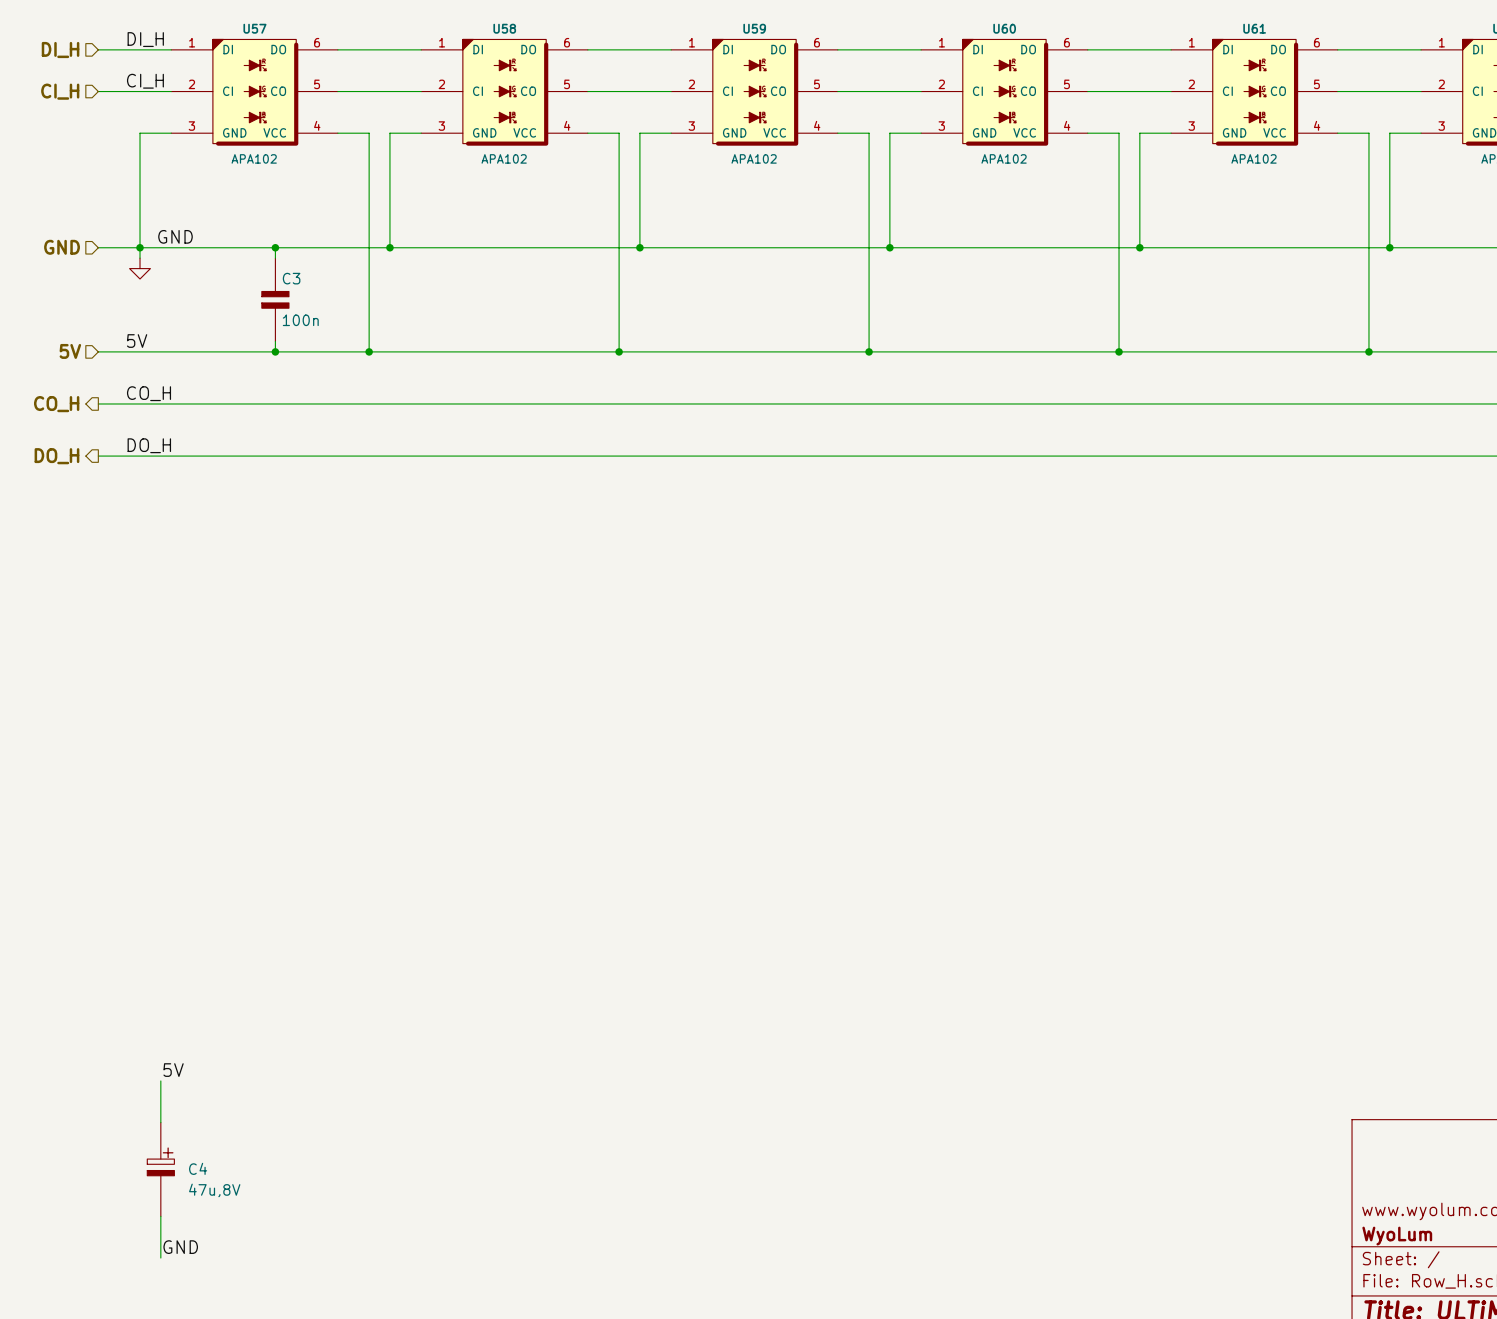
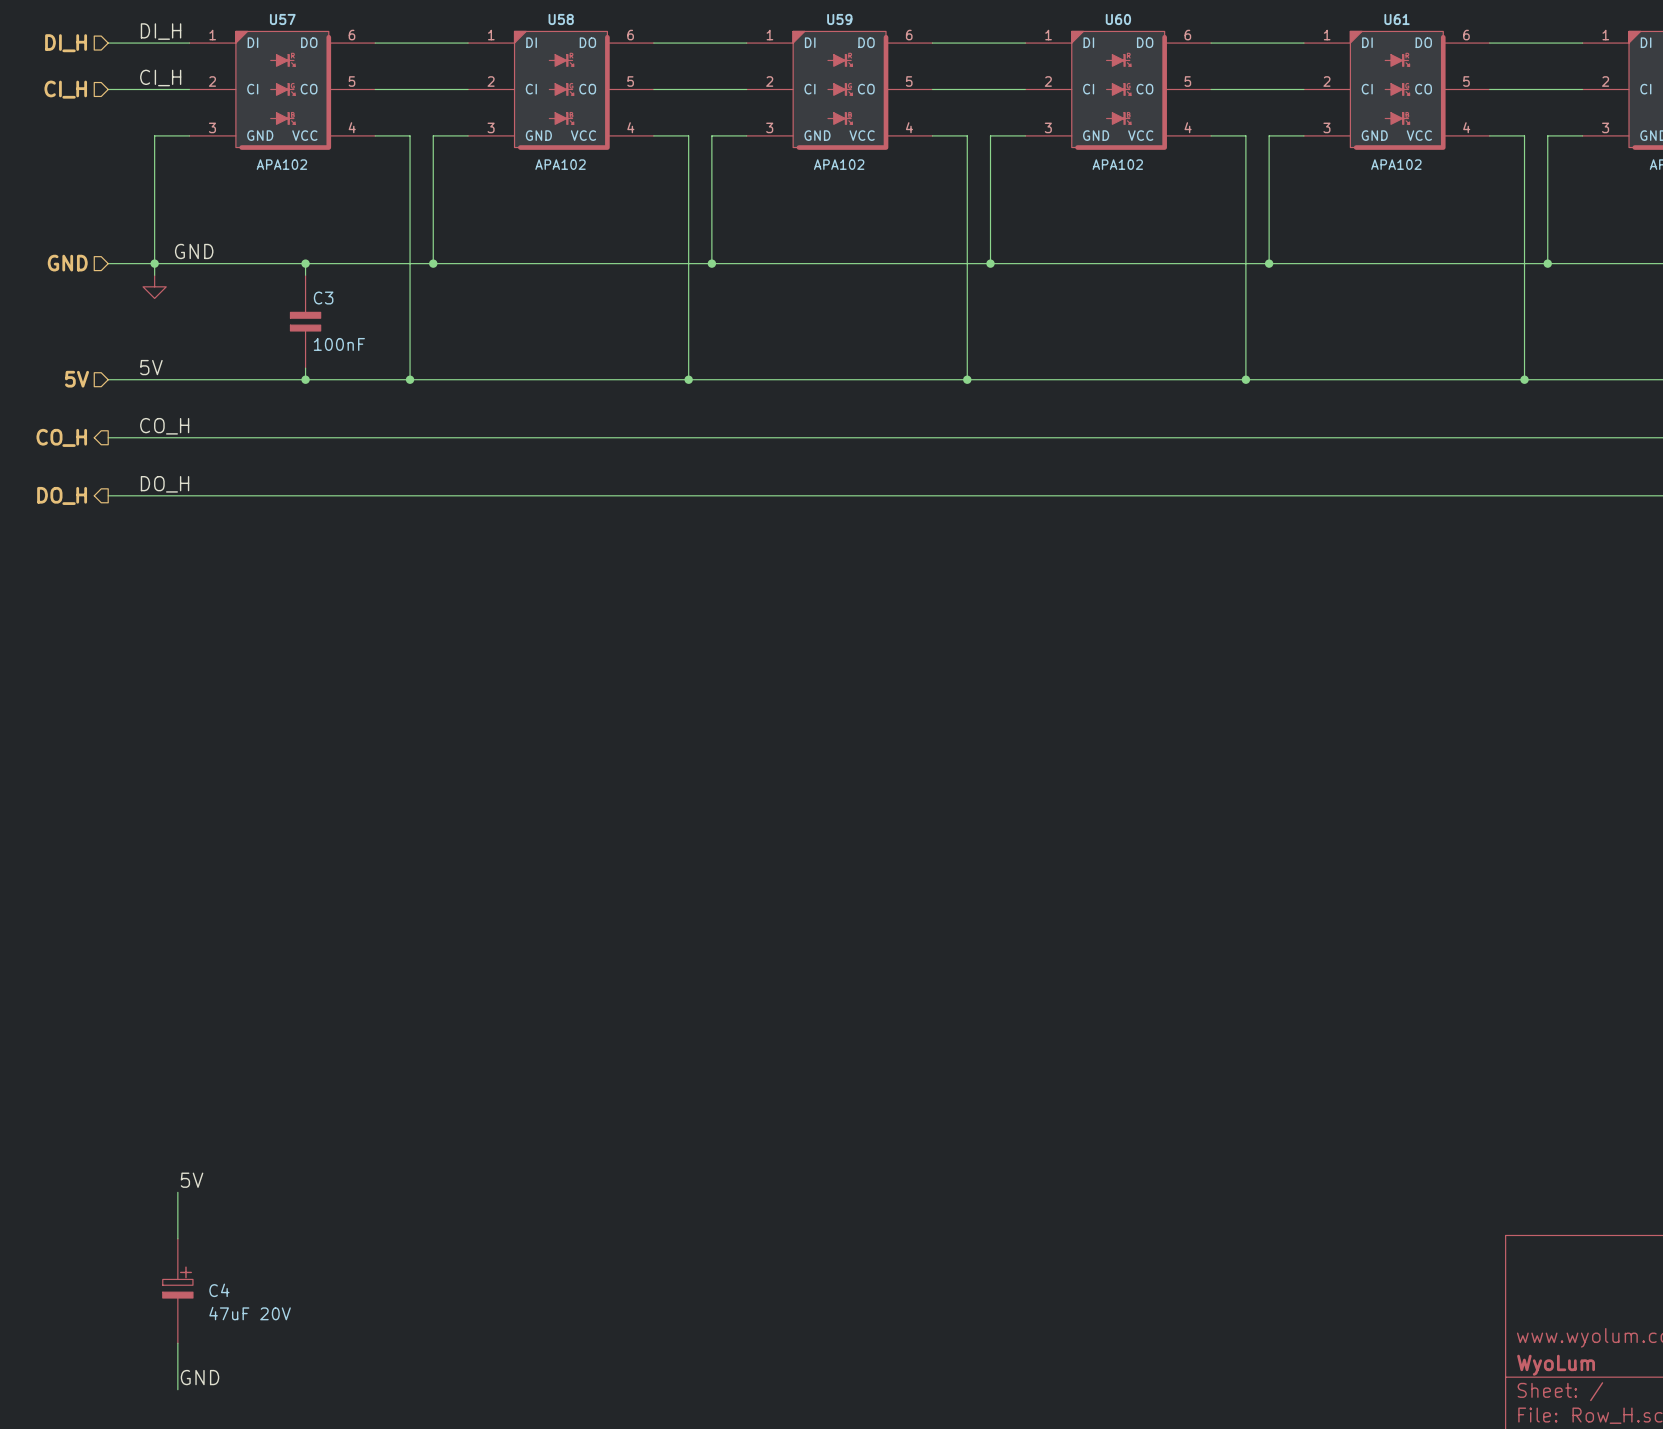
C3 value: 100n (300, 320) -> 100nF (339, 344)
C4 value: 47u,8V (214, 1190) -> 47uF 20V (250, 1313)

